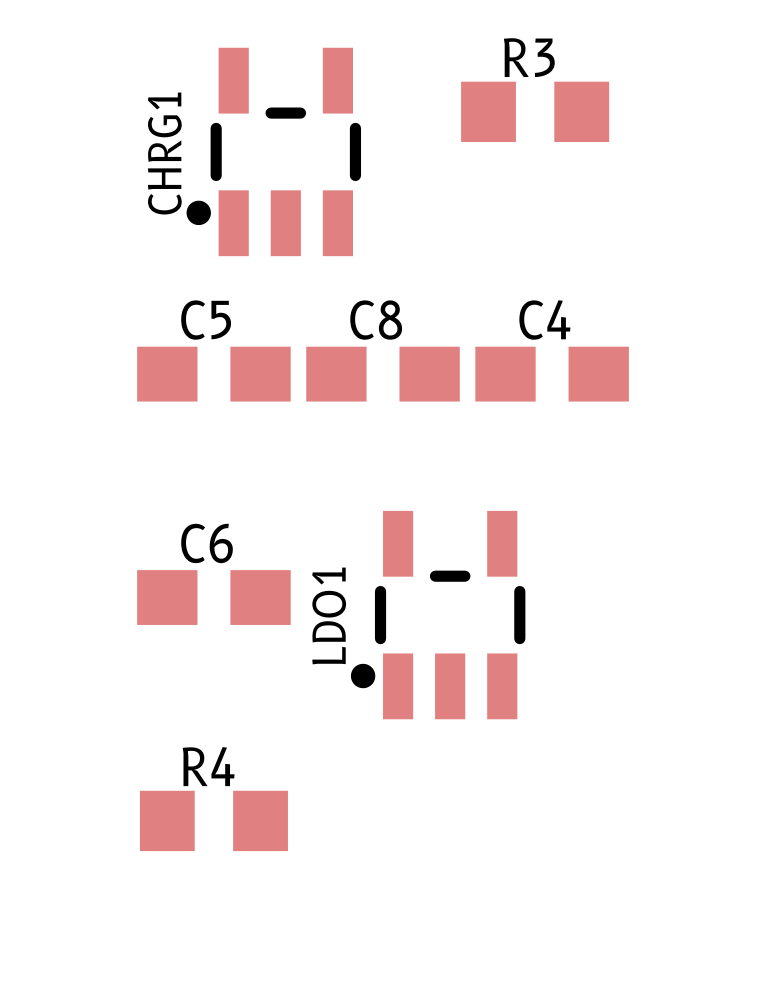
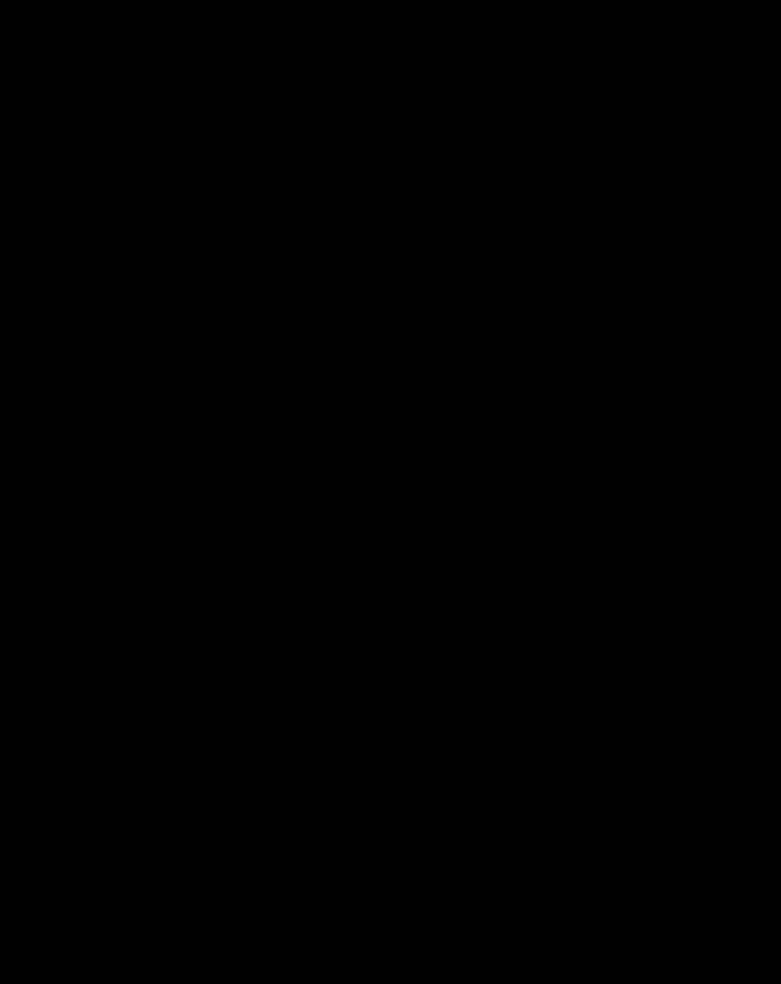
R3: (535, 111) -> none
CHRG1: (273, 151) -> none
C5: (213, 374) -> none
C8: (383, 374) -> none
C4: (552, 374) -> none
C6: (213, 597) -> none
LDO1: (438, 615) -> none
R4: (213, 820) -> none

